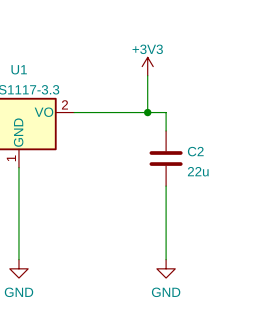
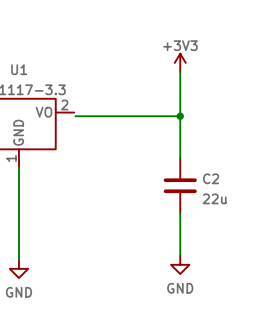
power symbol position: +3V3 (147, 66) -> +3V3 (180, 62)
wire: none -> (180, 72) (180, 158)
wire: (147, 75) (147, 112) -> none
wire: (74, 112) (166, 112) (166, 130) -> none
junction position: (147, 112) -> (180, 116)
wire: none -> (75, 116) (180, 116)
C2 position: (166, 158) -> (180, 185)
wire: (166, 186) (166, 259) -> none
wire: none -> (180, 213) (180, 255)
power symbol position: GND (166, 268) -> GND (180, 264)

